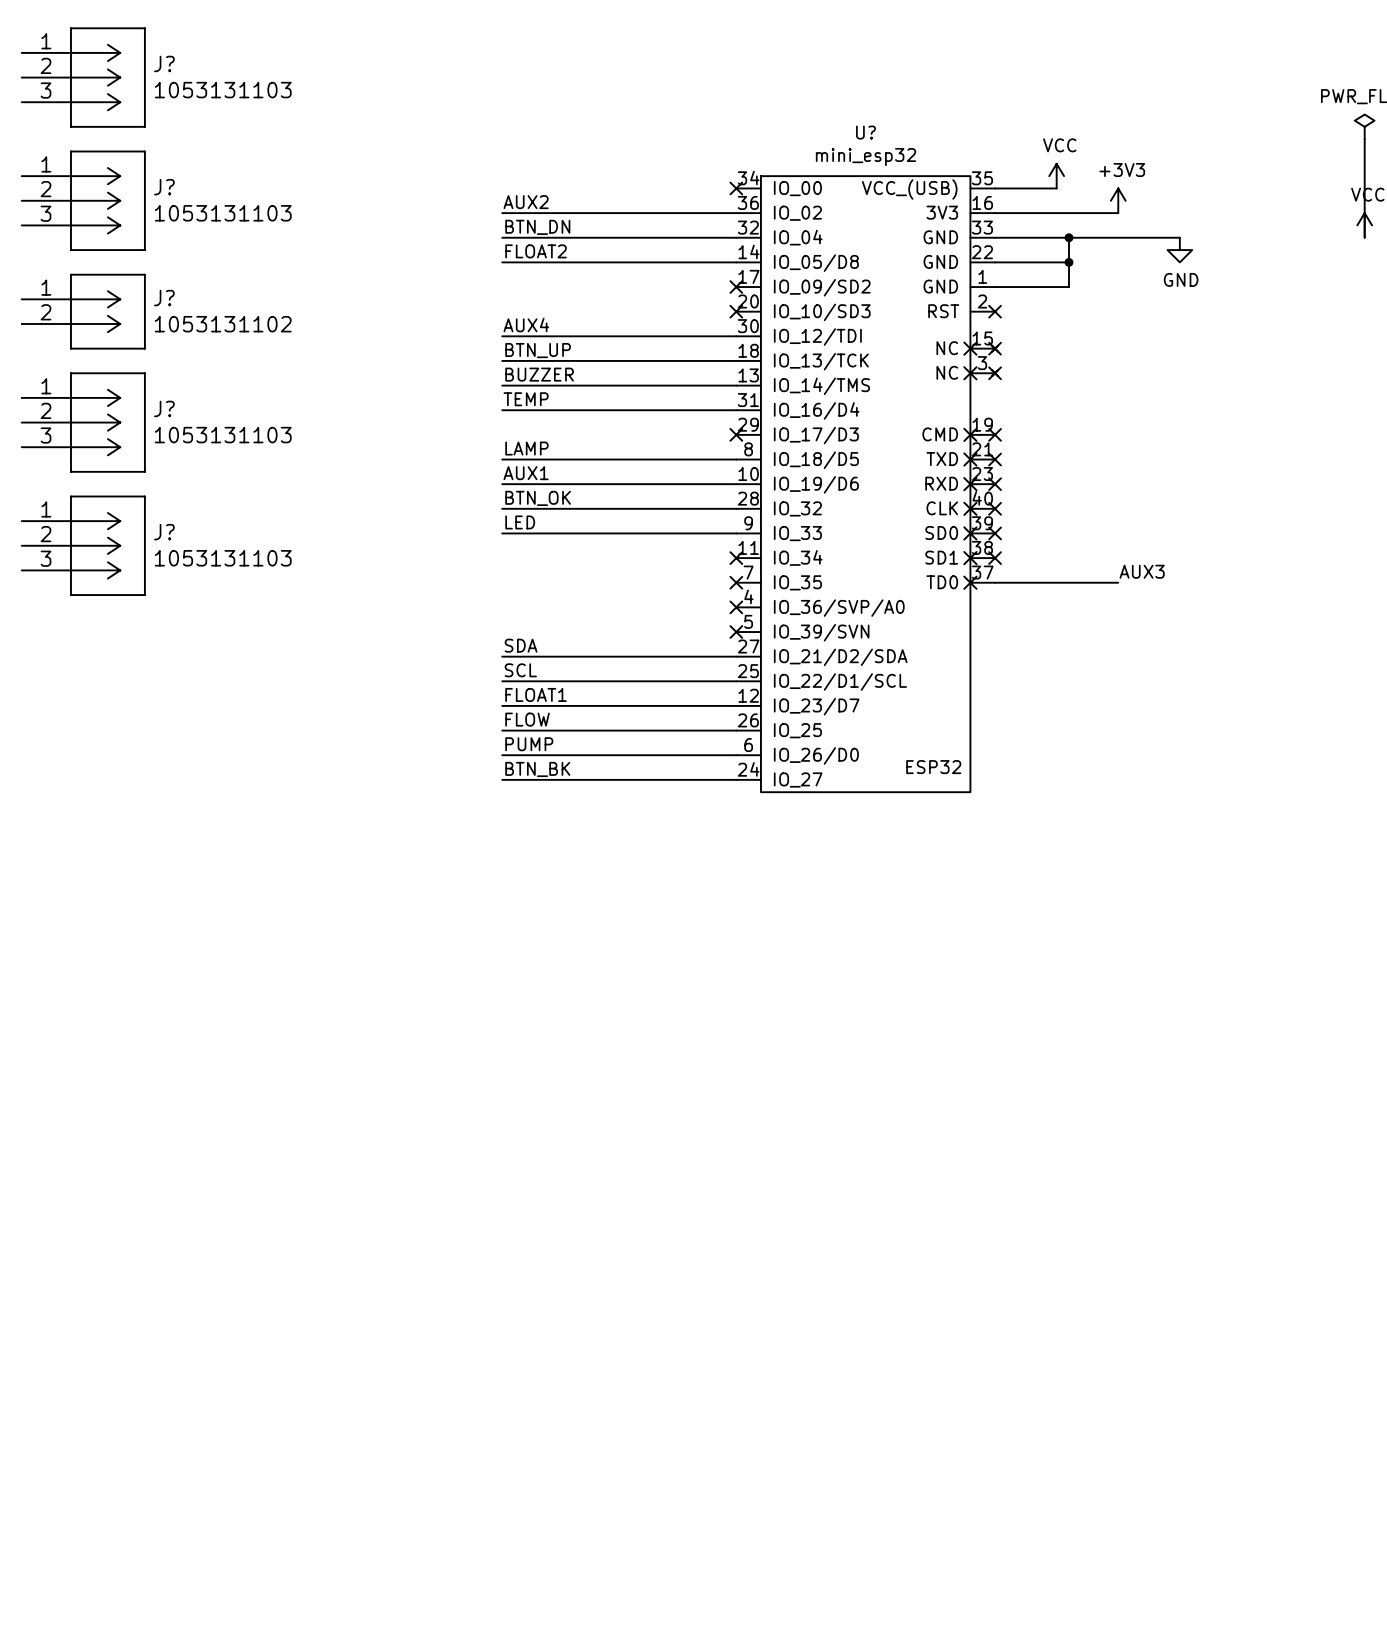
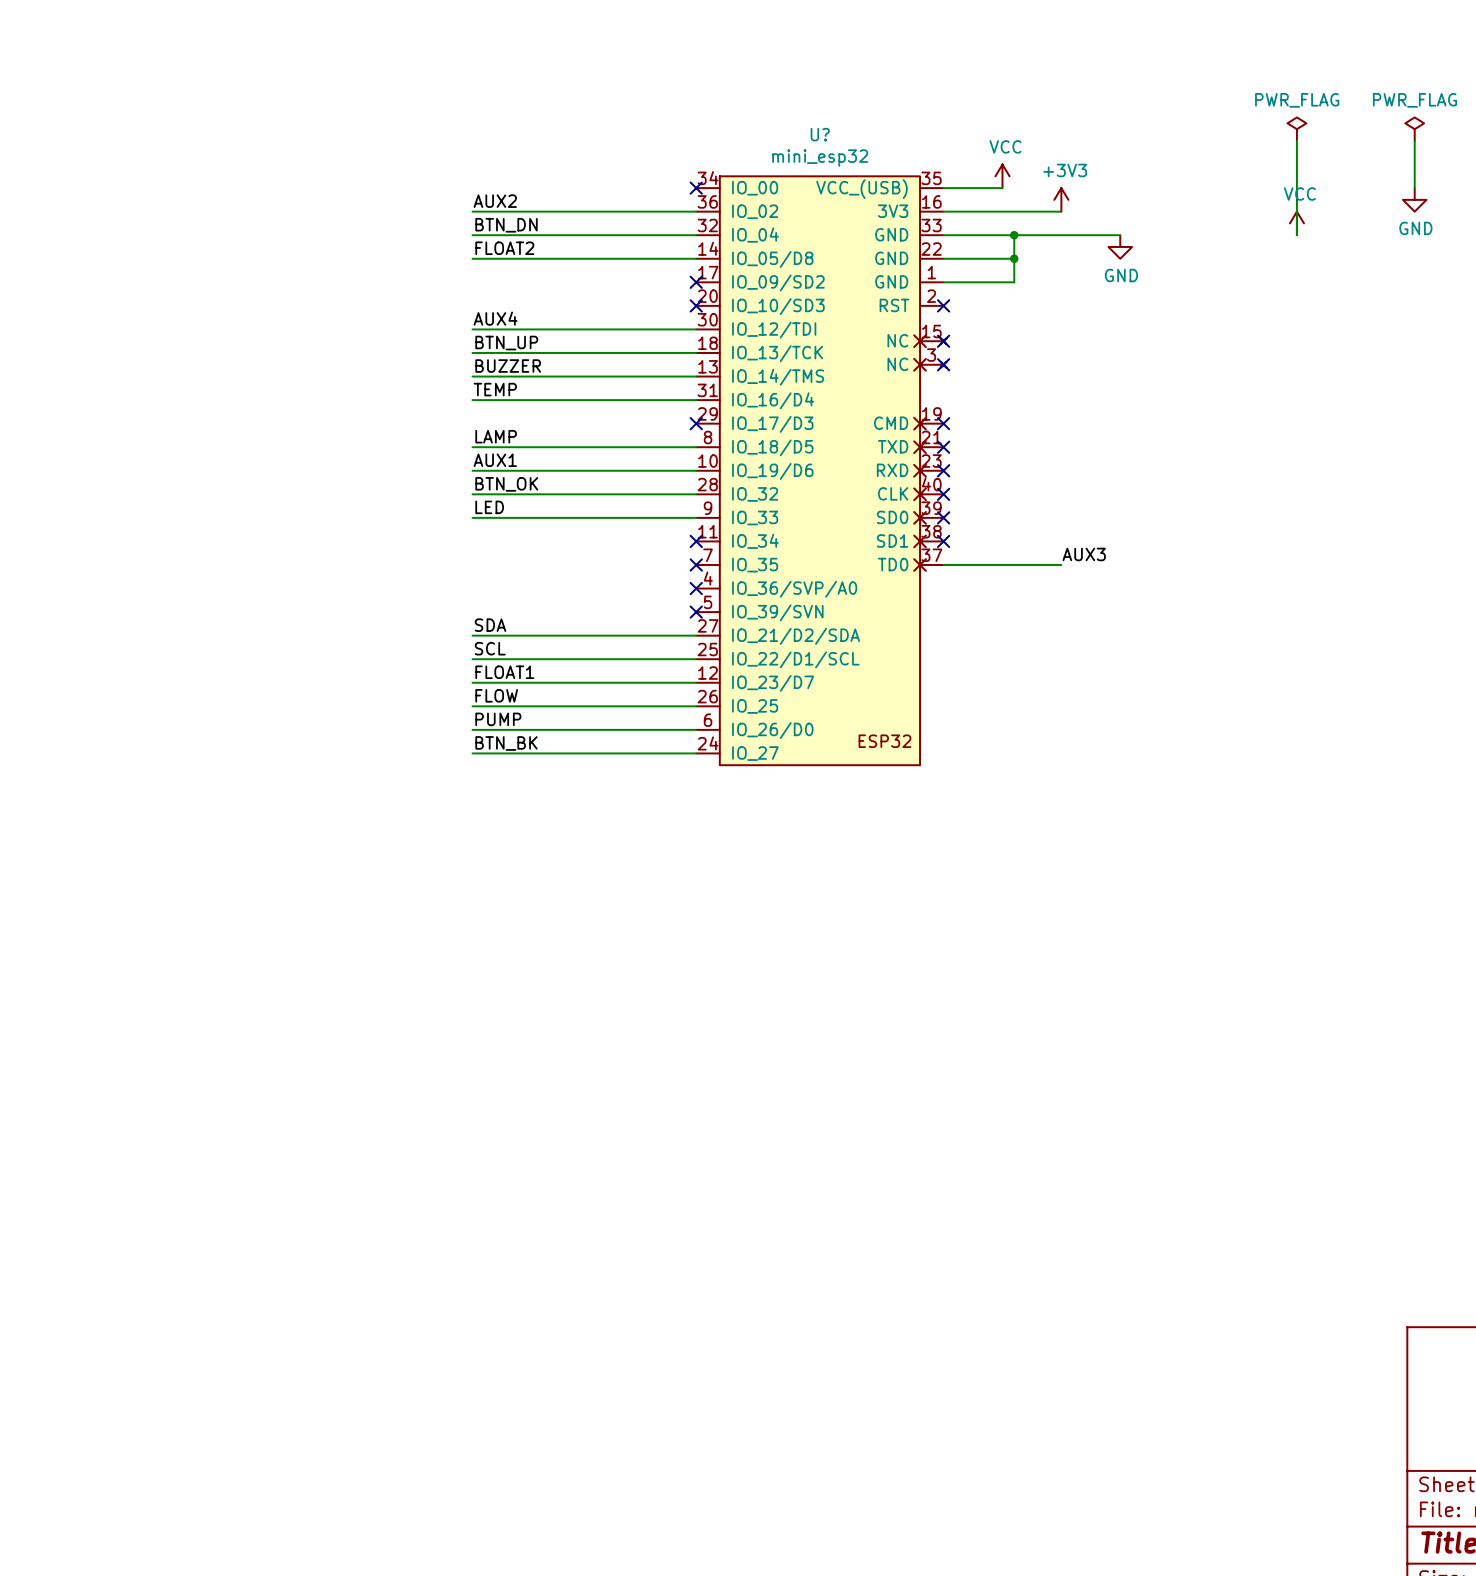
J?: 1053131103 (83, 77) -> none
J?: 1053131103 (83, 200) -> none
J?: 1053131102 (83, 311) -> none
J?: 1053131103 (83, 422) -> none
J?: 1053131103 (83, 545) -> none

